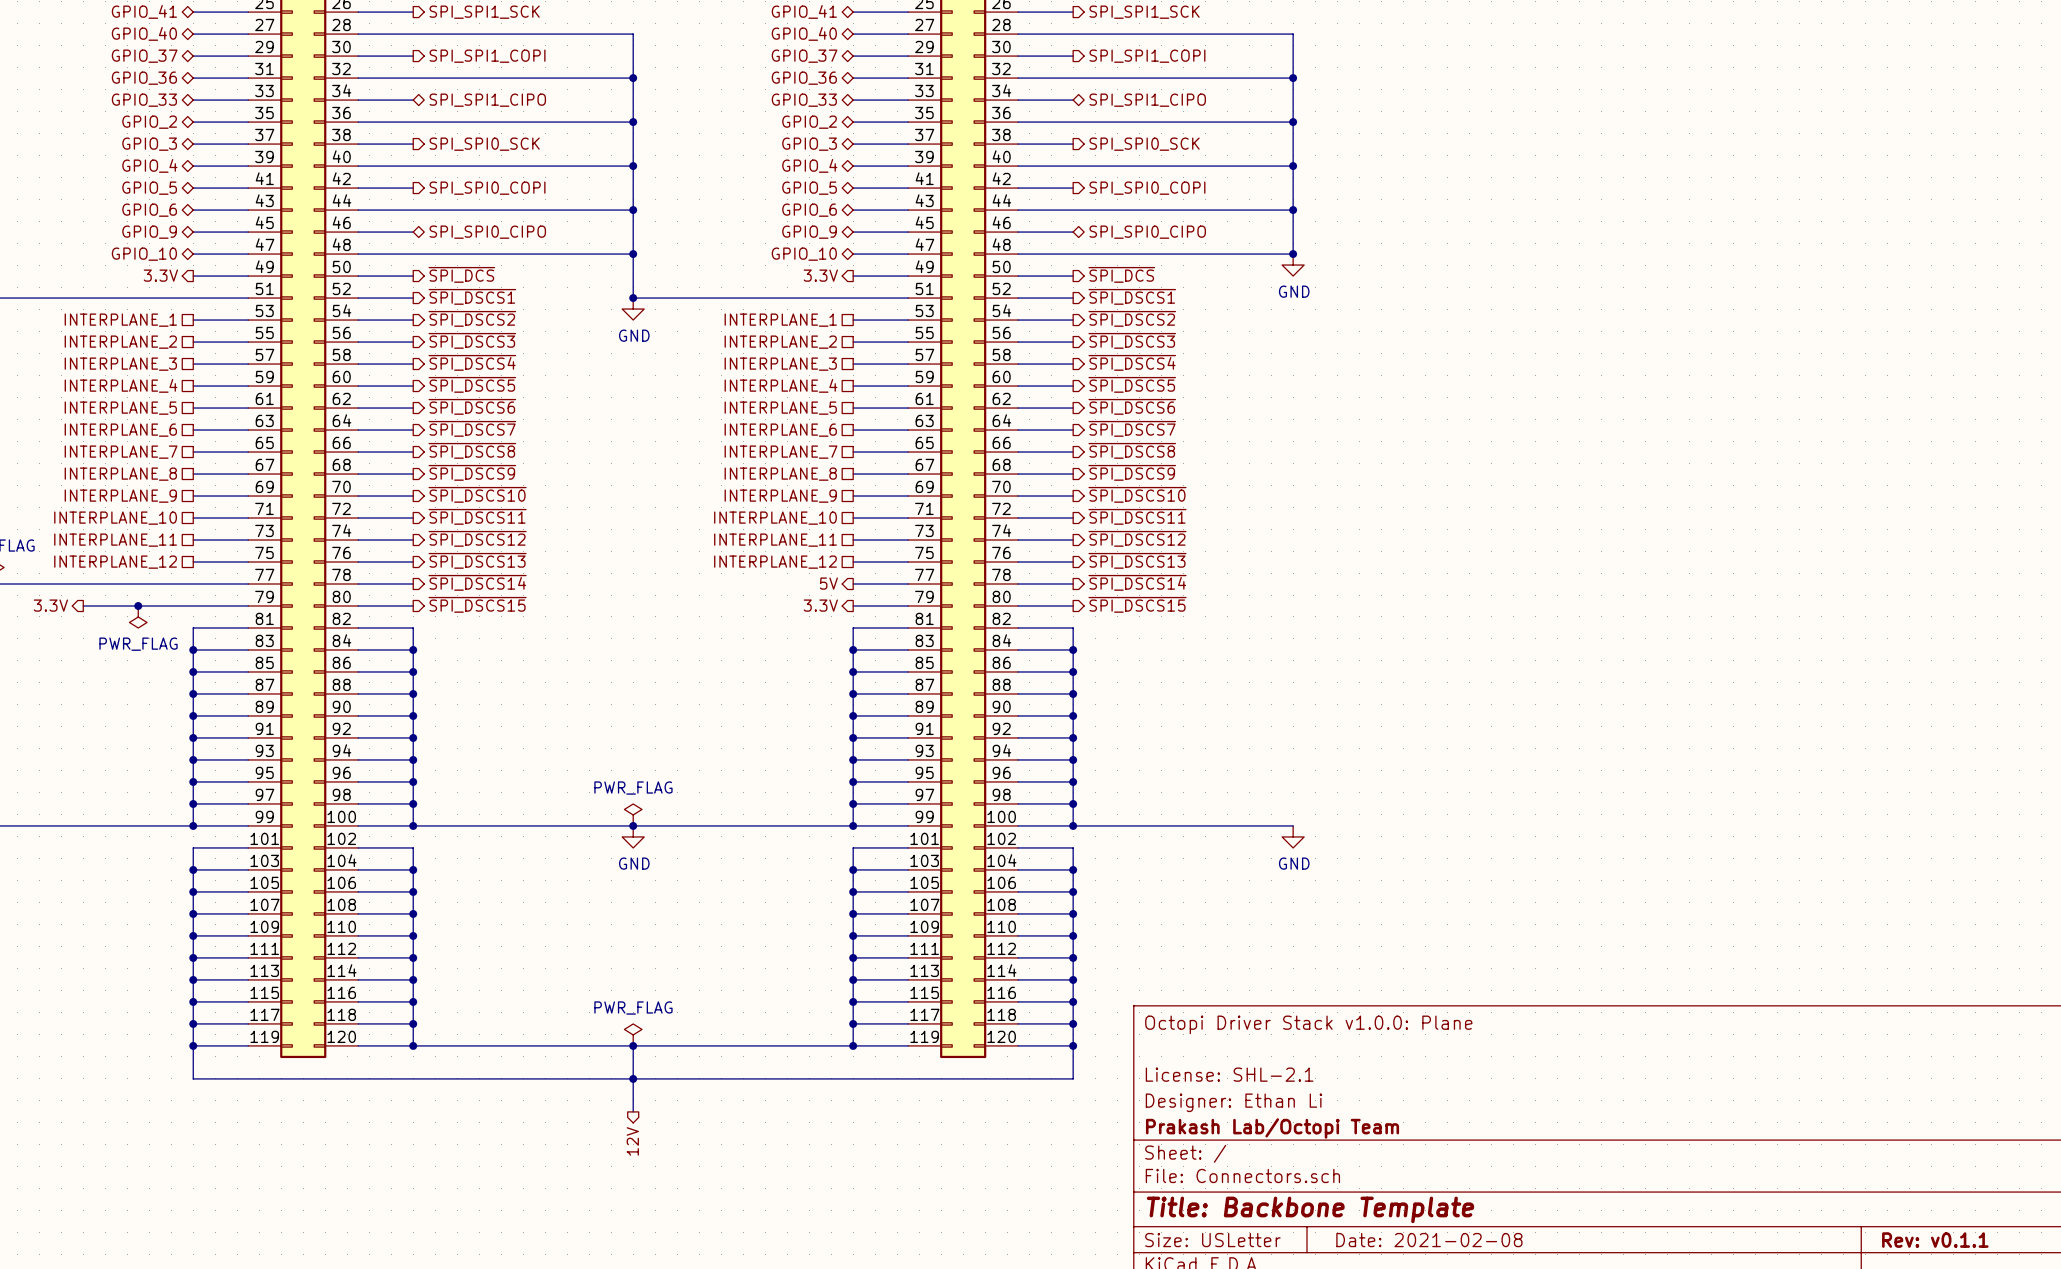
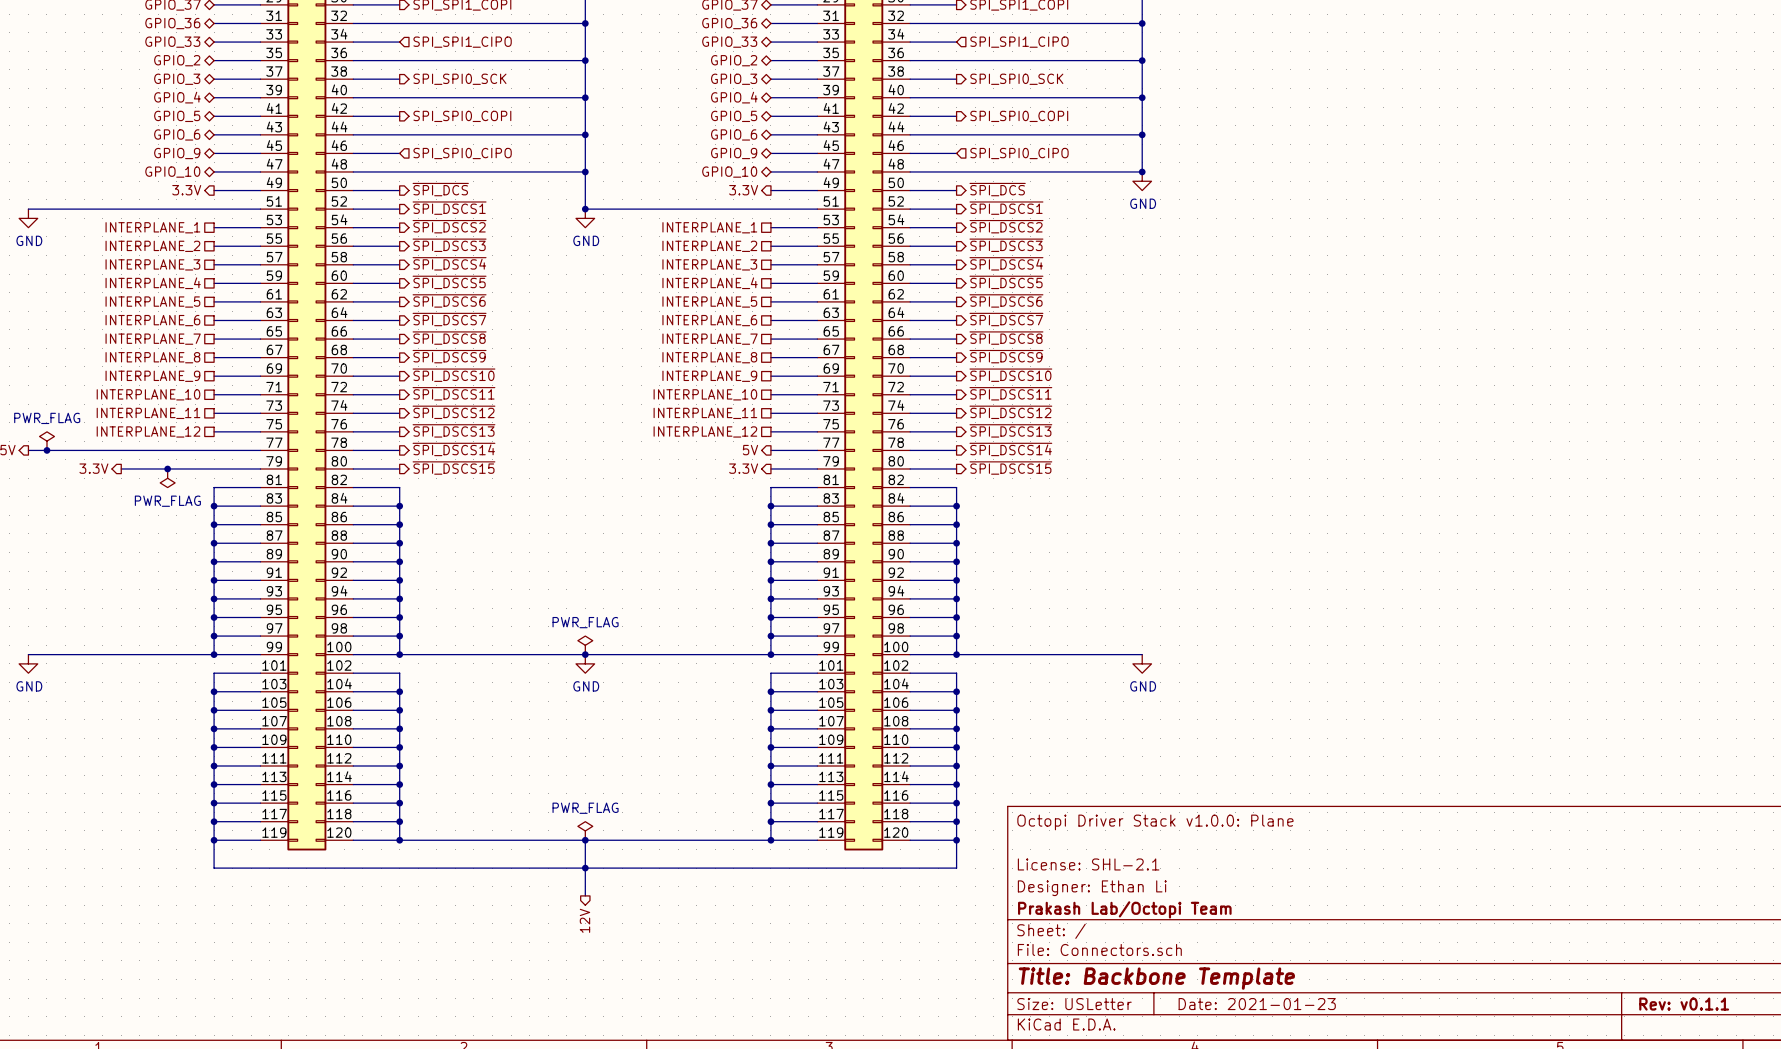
hierarchical label shape: bidirectional (487, 100) -> input (462, 42)
hierarchical label shape: bidirectional (1147, 100) -> input (1019, 42)
hierarchical label shape: bidirectional (487, 232) -> input (462, 153)
hierarchical label shape: bidirectional (1147, 232) -> input (1019, 153)
title block: Date: 2021-02-08 (1429, 1240) -> Date: 2021-01-23 (1257, 1004)

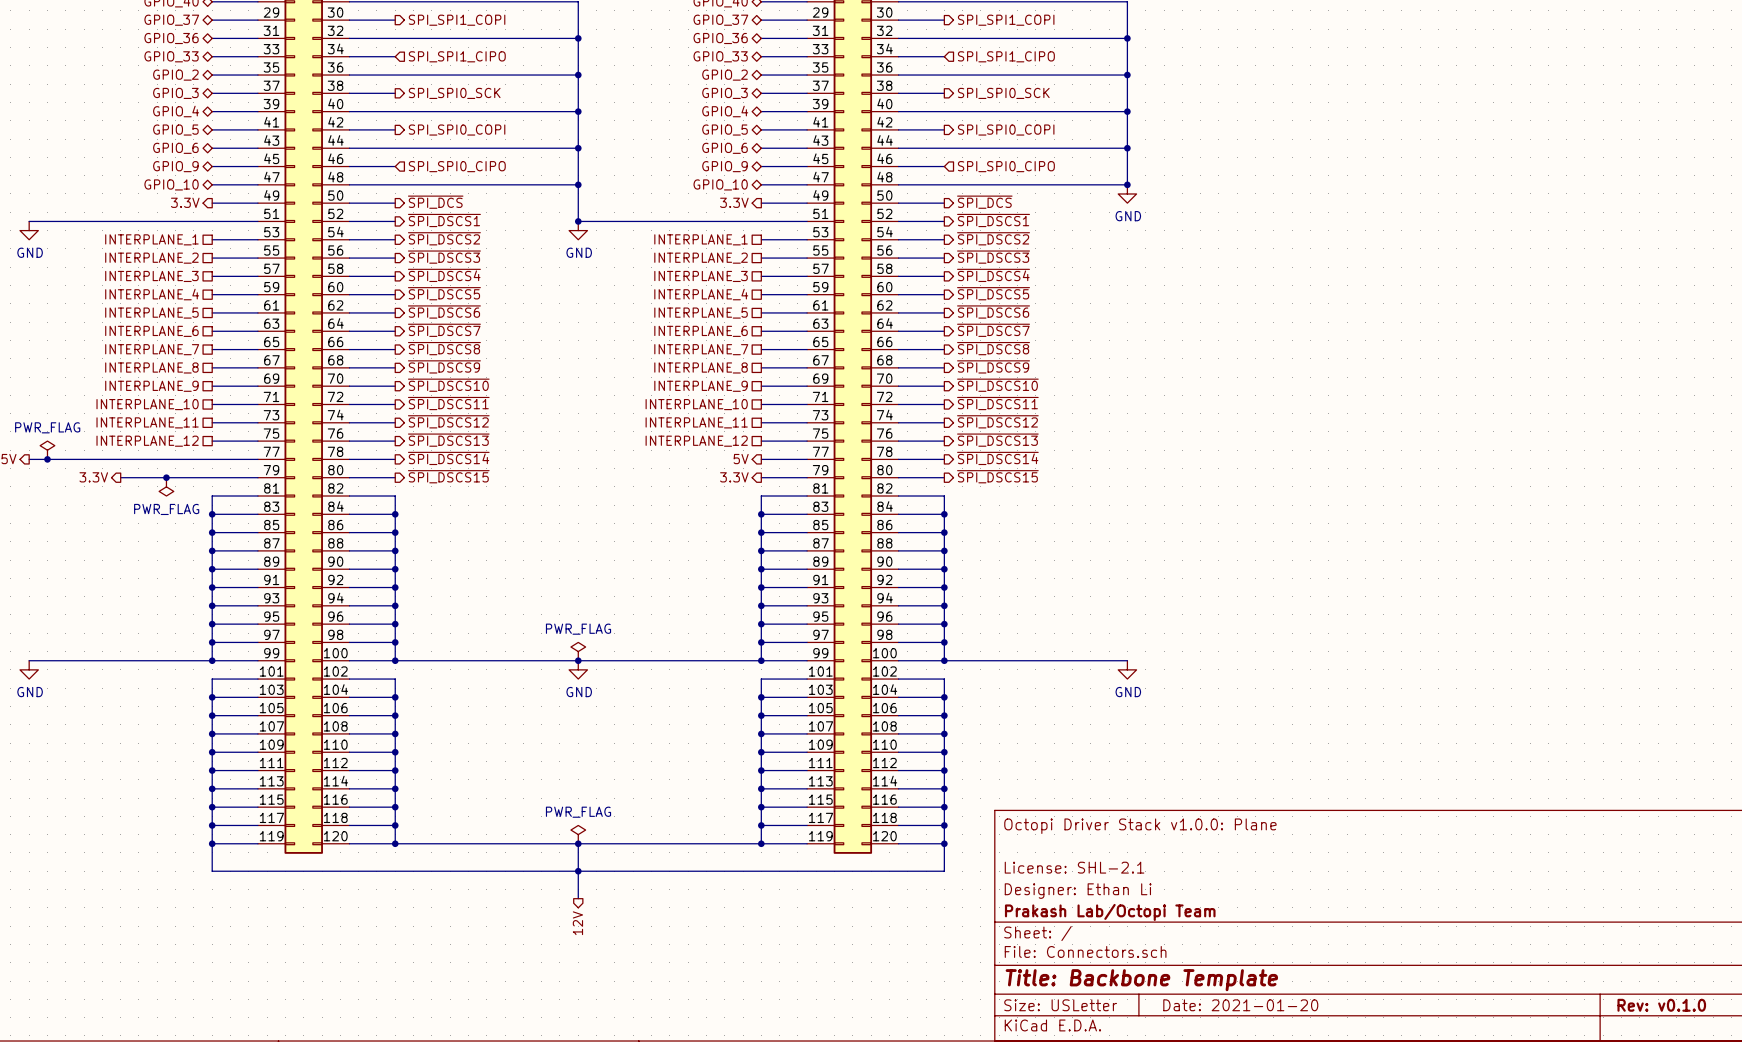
title block: Date: 2021-01-23 (1257, 1004) -> Date: 2021-01-20 (1240, 1005)
title block: Rev: v0.1.1 (1684, 1004) -> Rev: v0.1.0 (1661, 1005)

